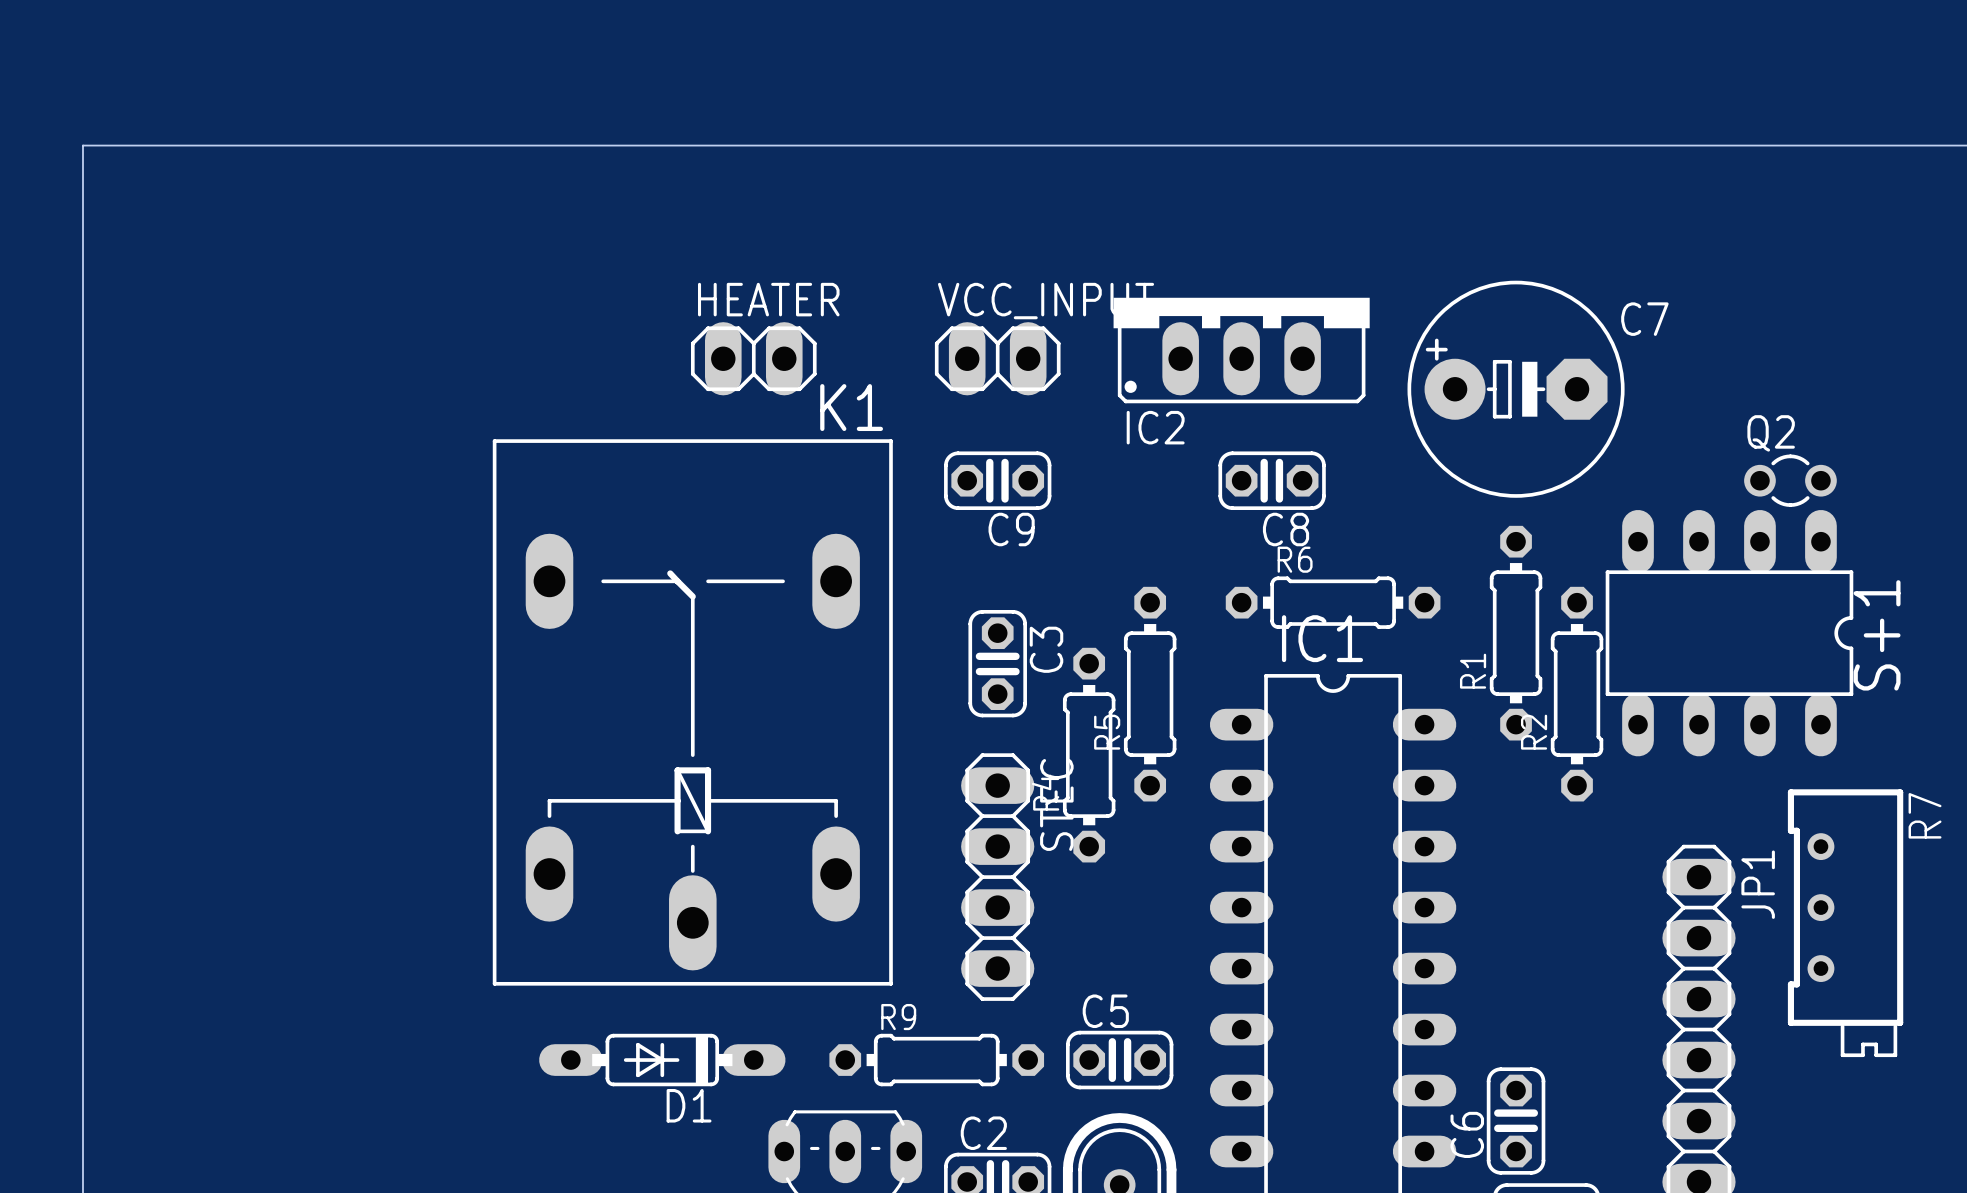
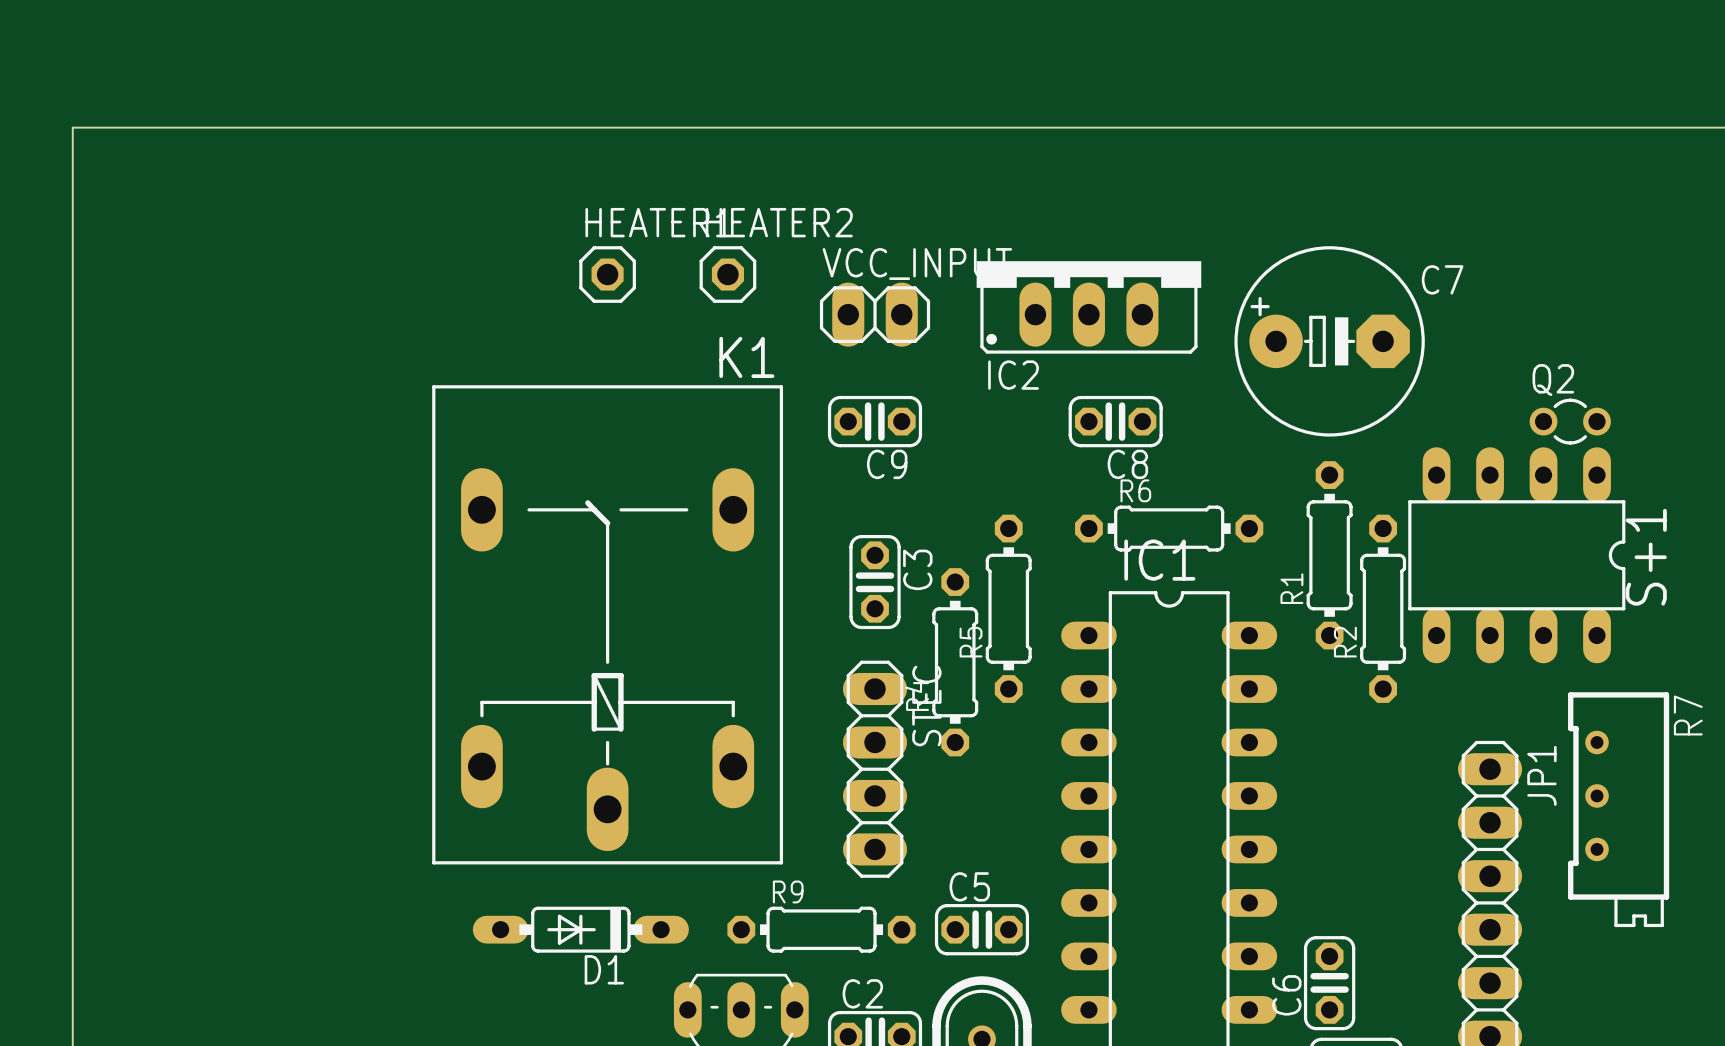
HEATER1: none -> (607, 274)
HEATER2: none -> (727, 274)
HEATER: (753, 358) -> none

